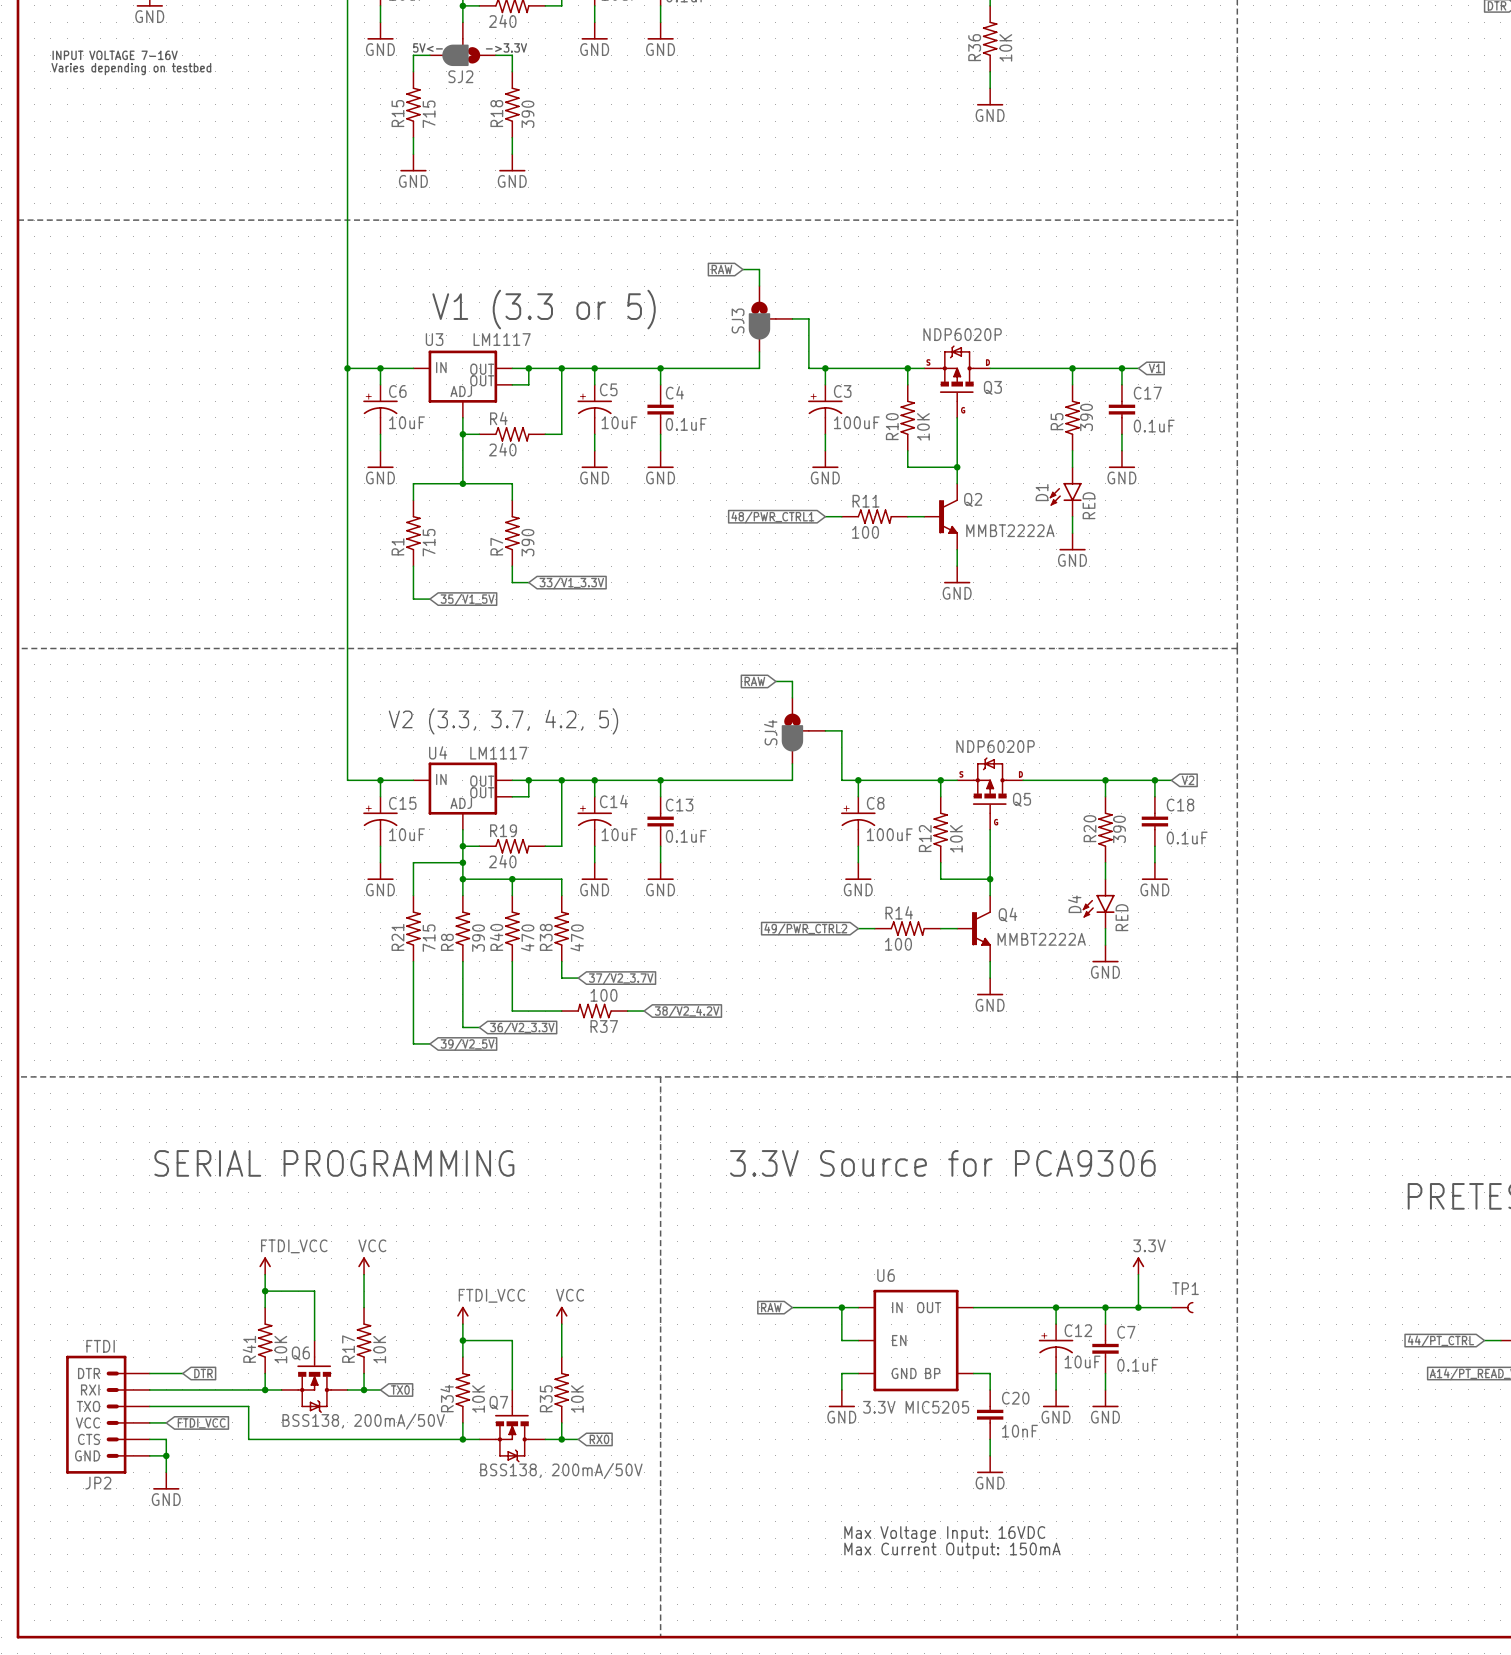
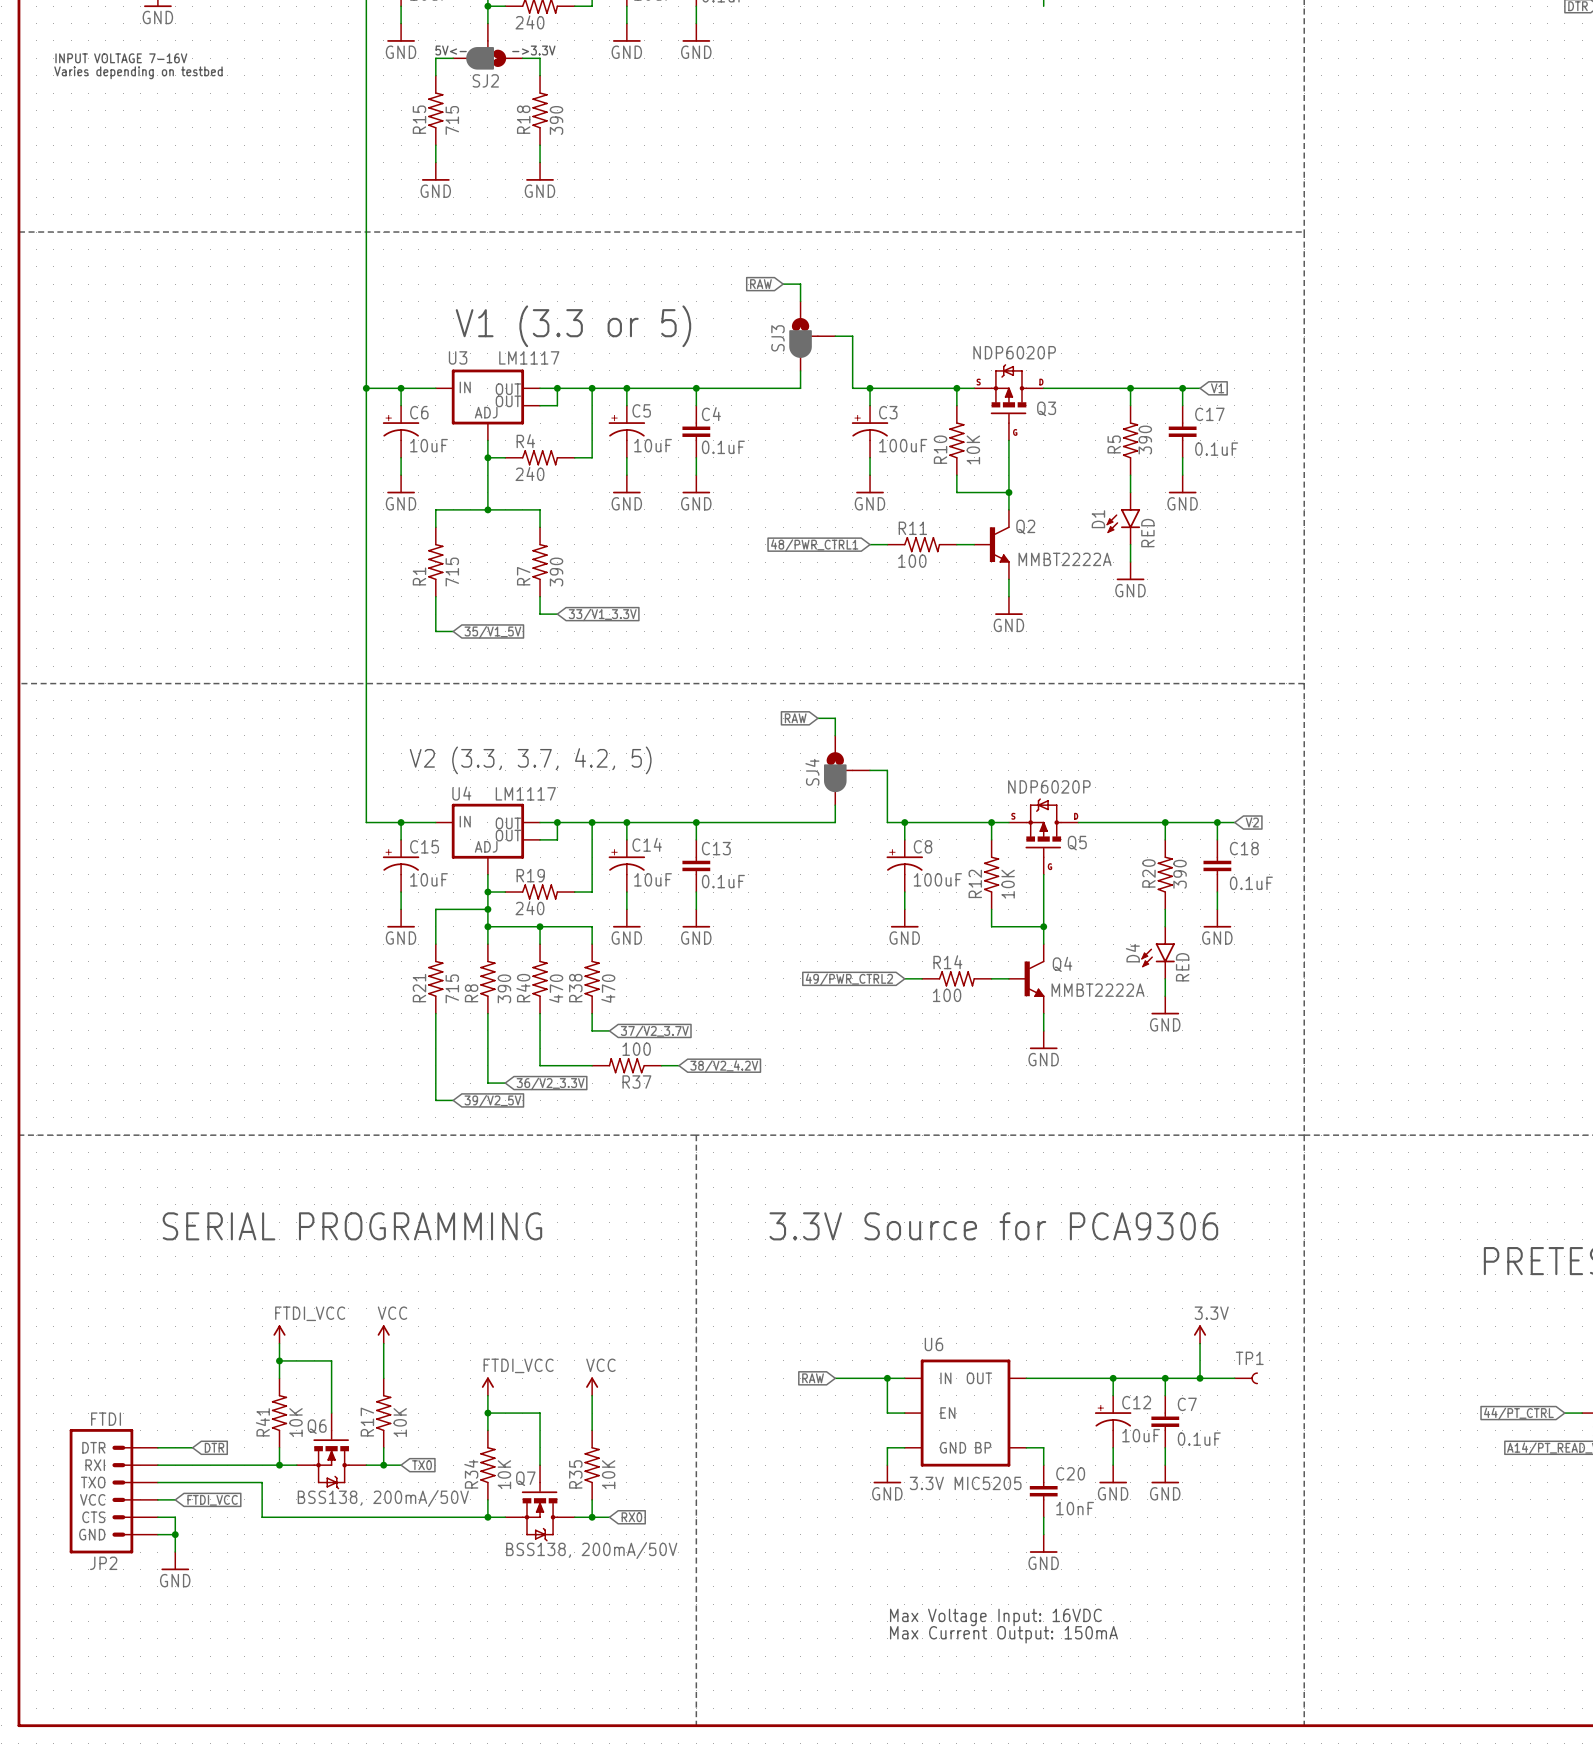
R36: 10K (990, 38) -> none
wire: (990, 71) (990, 88) -> none
power symbol: GND (990, 96) -> none

